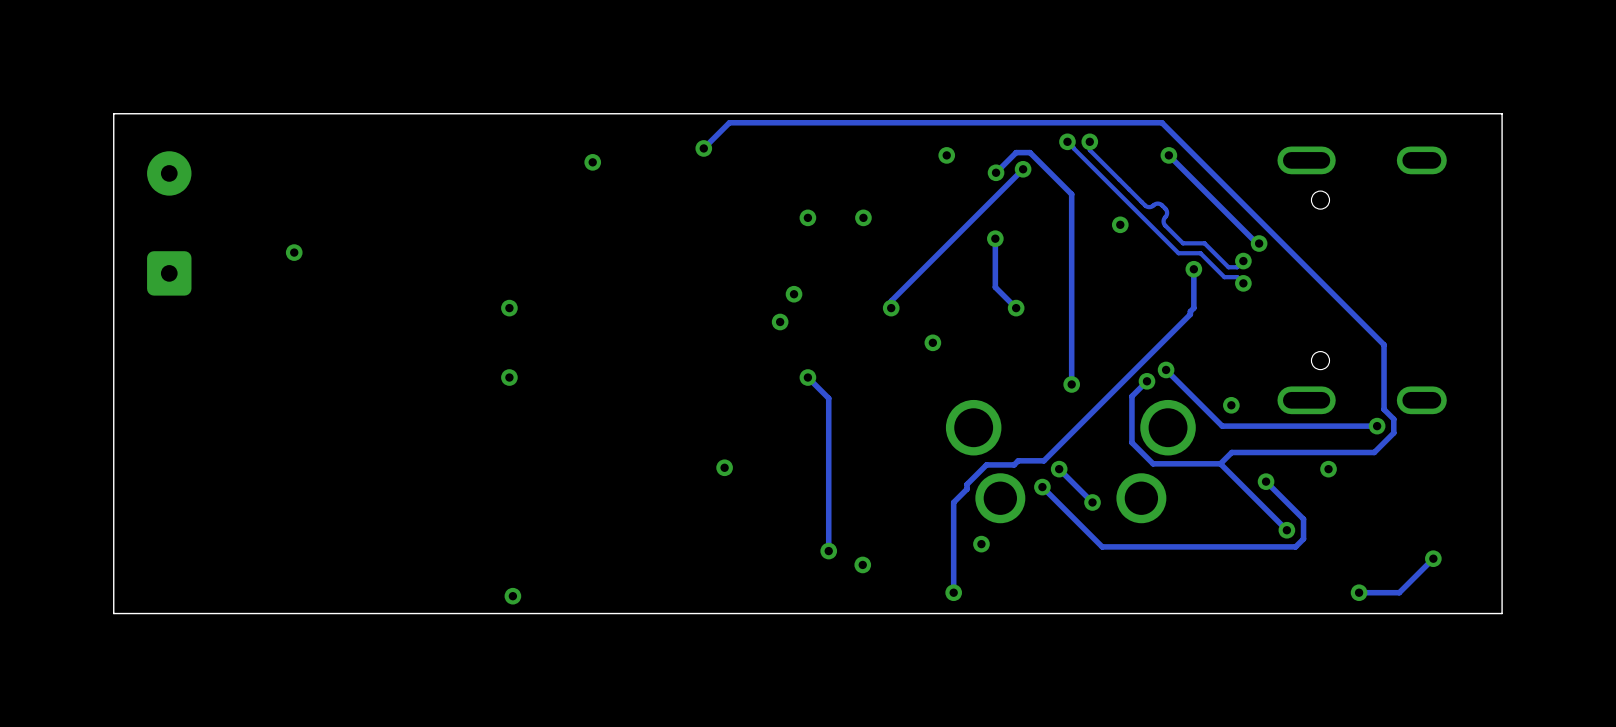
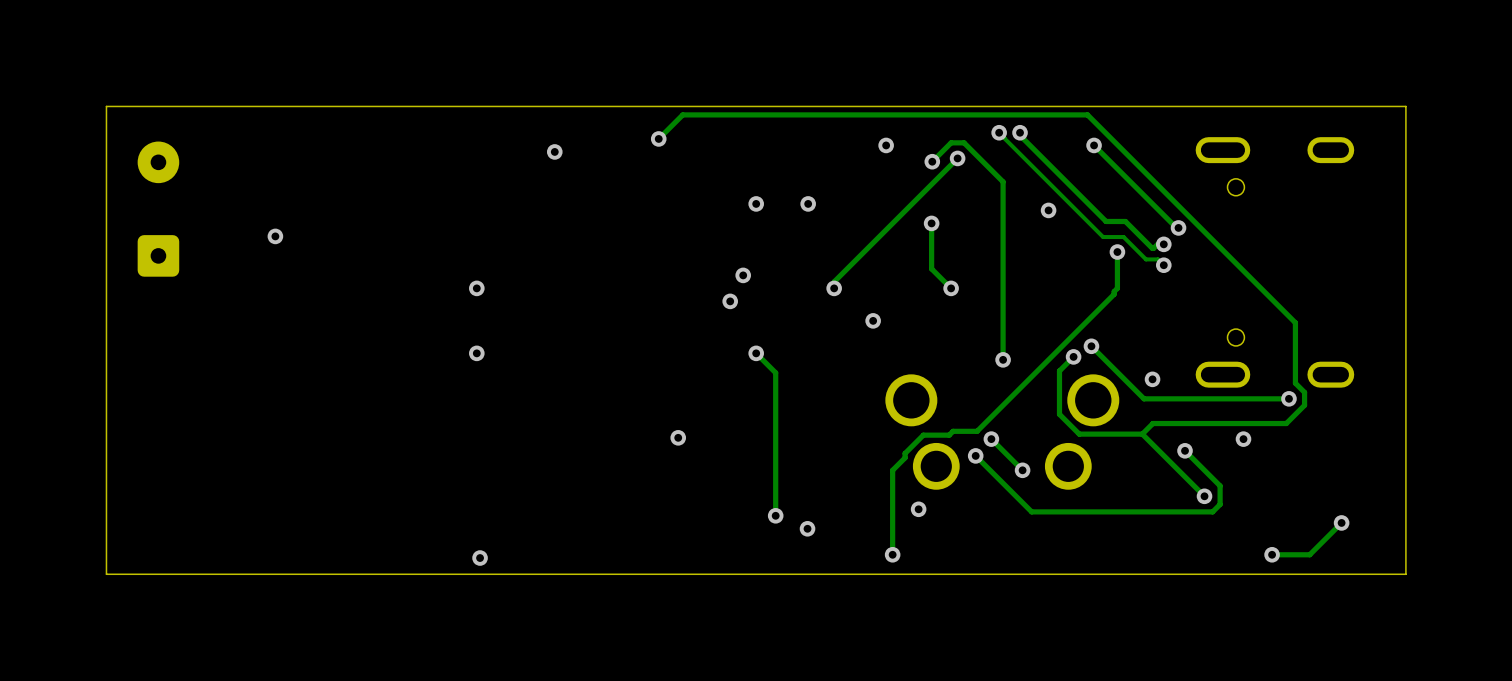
track: none -> (1020, 130) (1020, 136) (1106, 221) (1125, 221) (1152, 248) (1158, 243)
track: (1089, 141) (1089, 150) (1145, 205) (1150, 207) (1158, 203) (1165, 208) (1167, 213) (1163, 219) (1164, 224) (1183, 243) (1204, 243) (1228, 267) (1237, 267) (1243, 261) -> none

